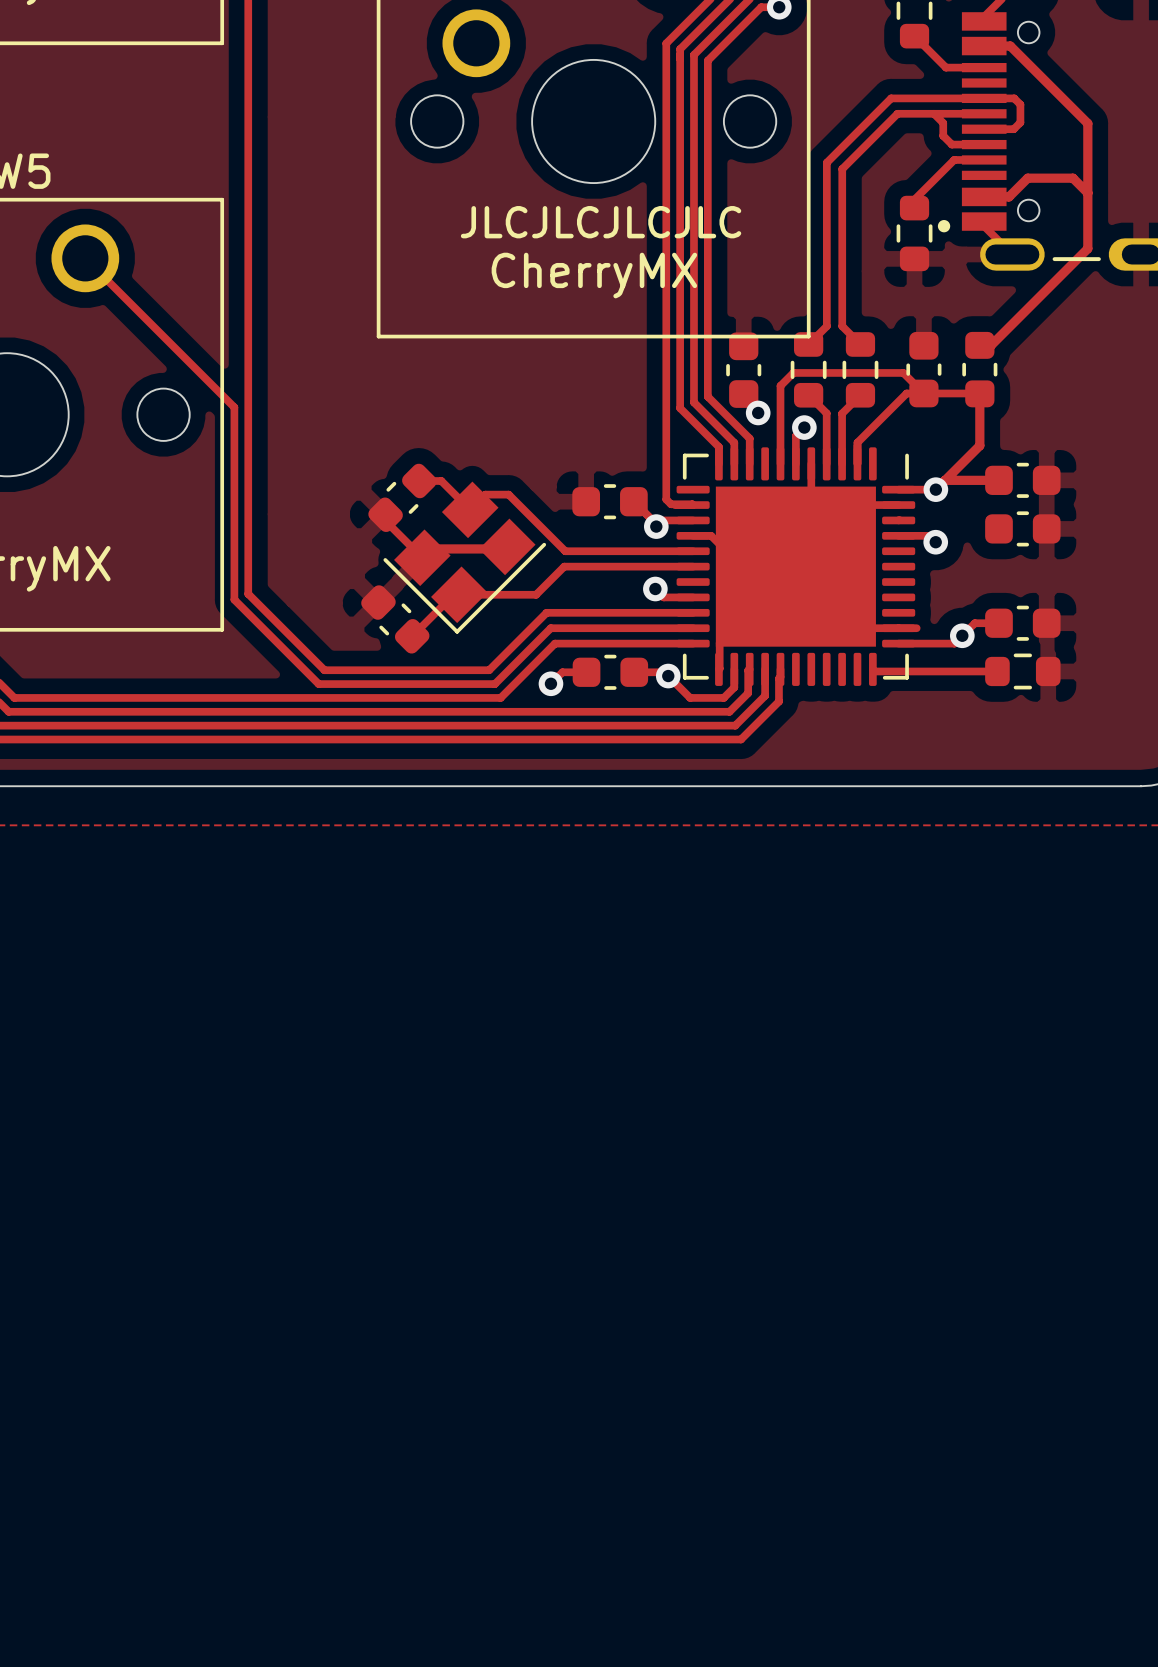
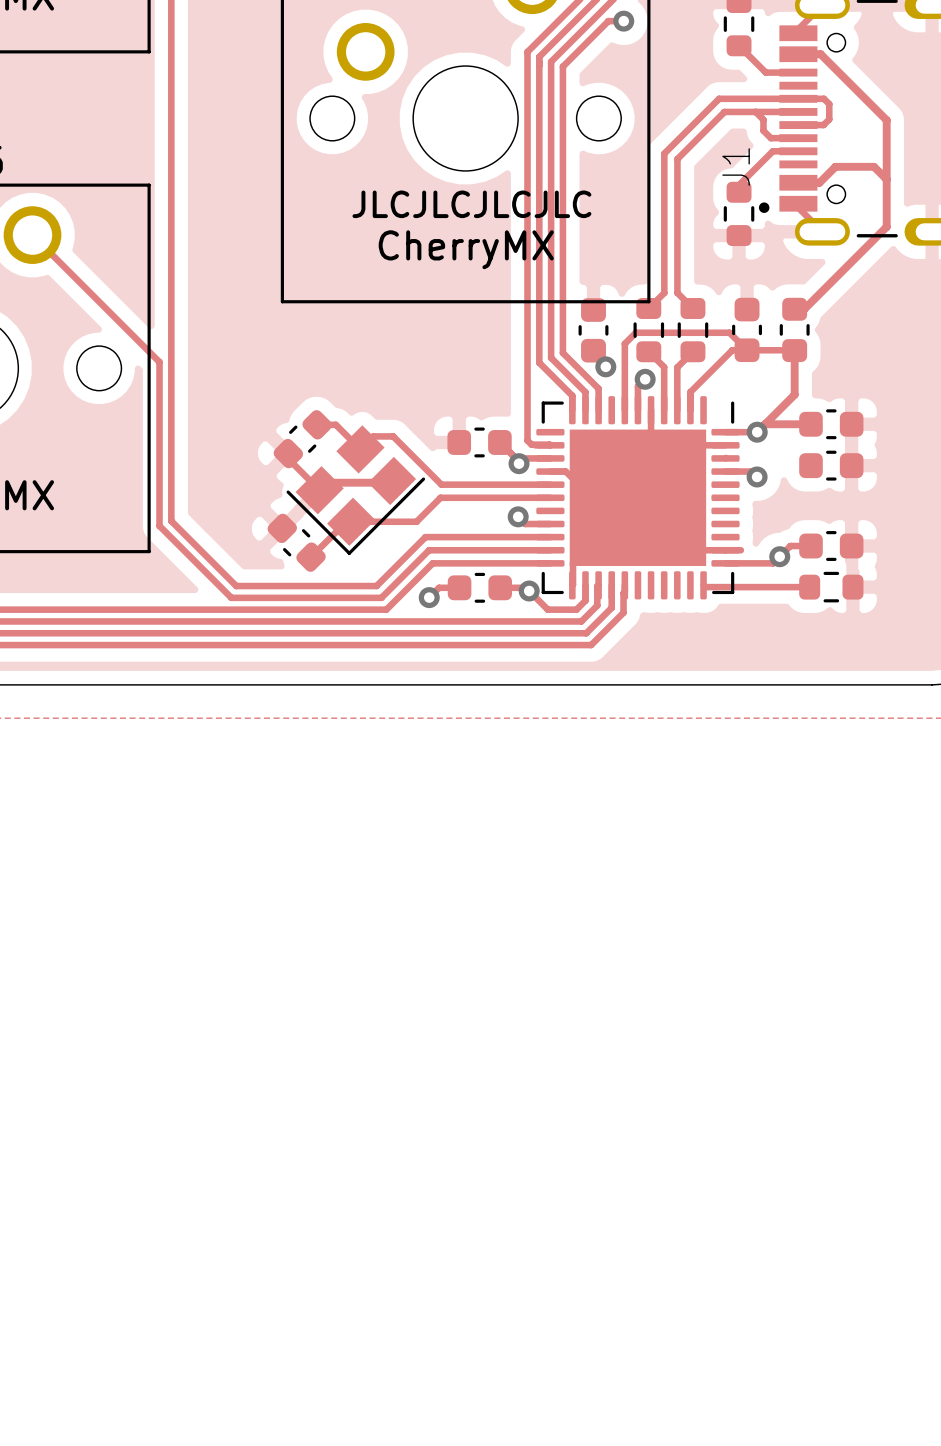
J1 name: none -> J1 (736, 167)

